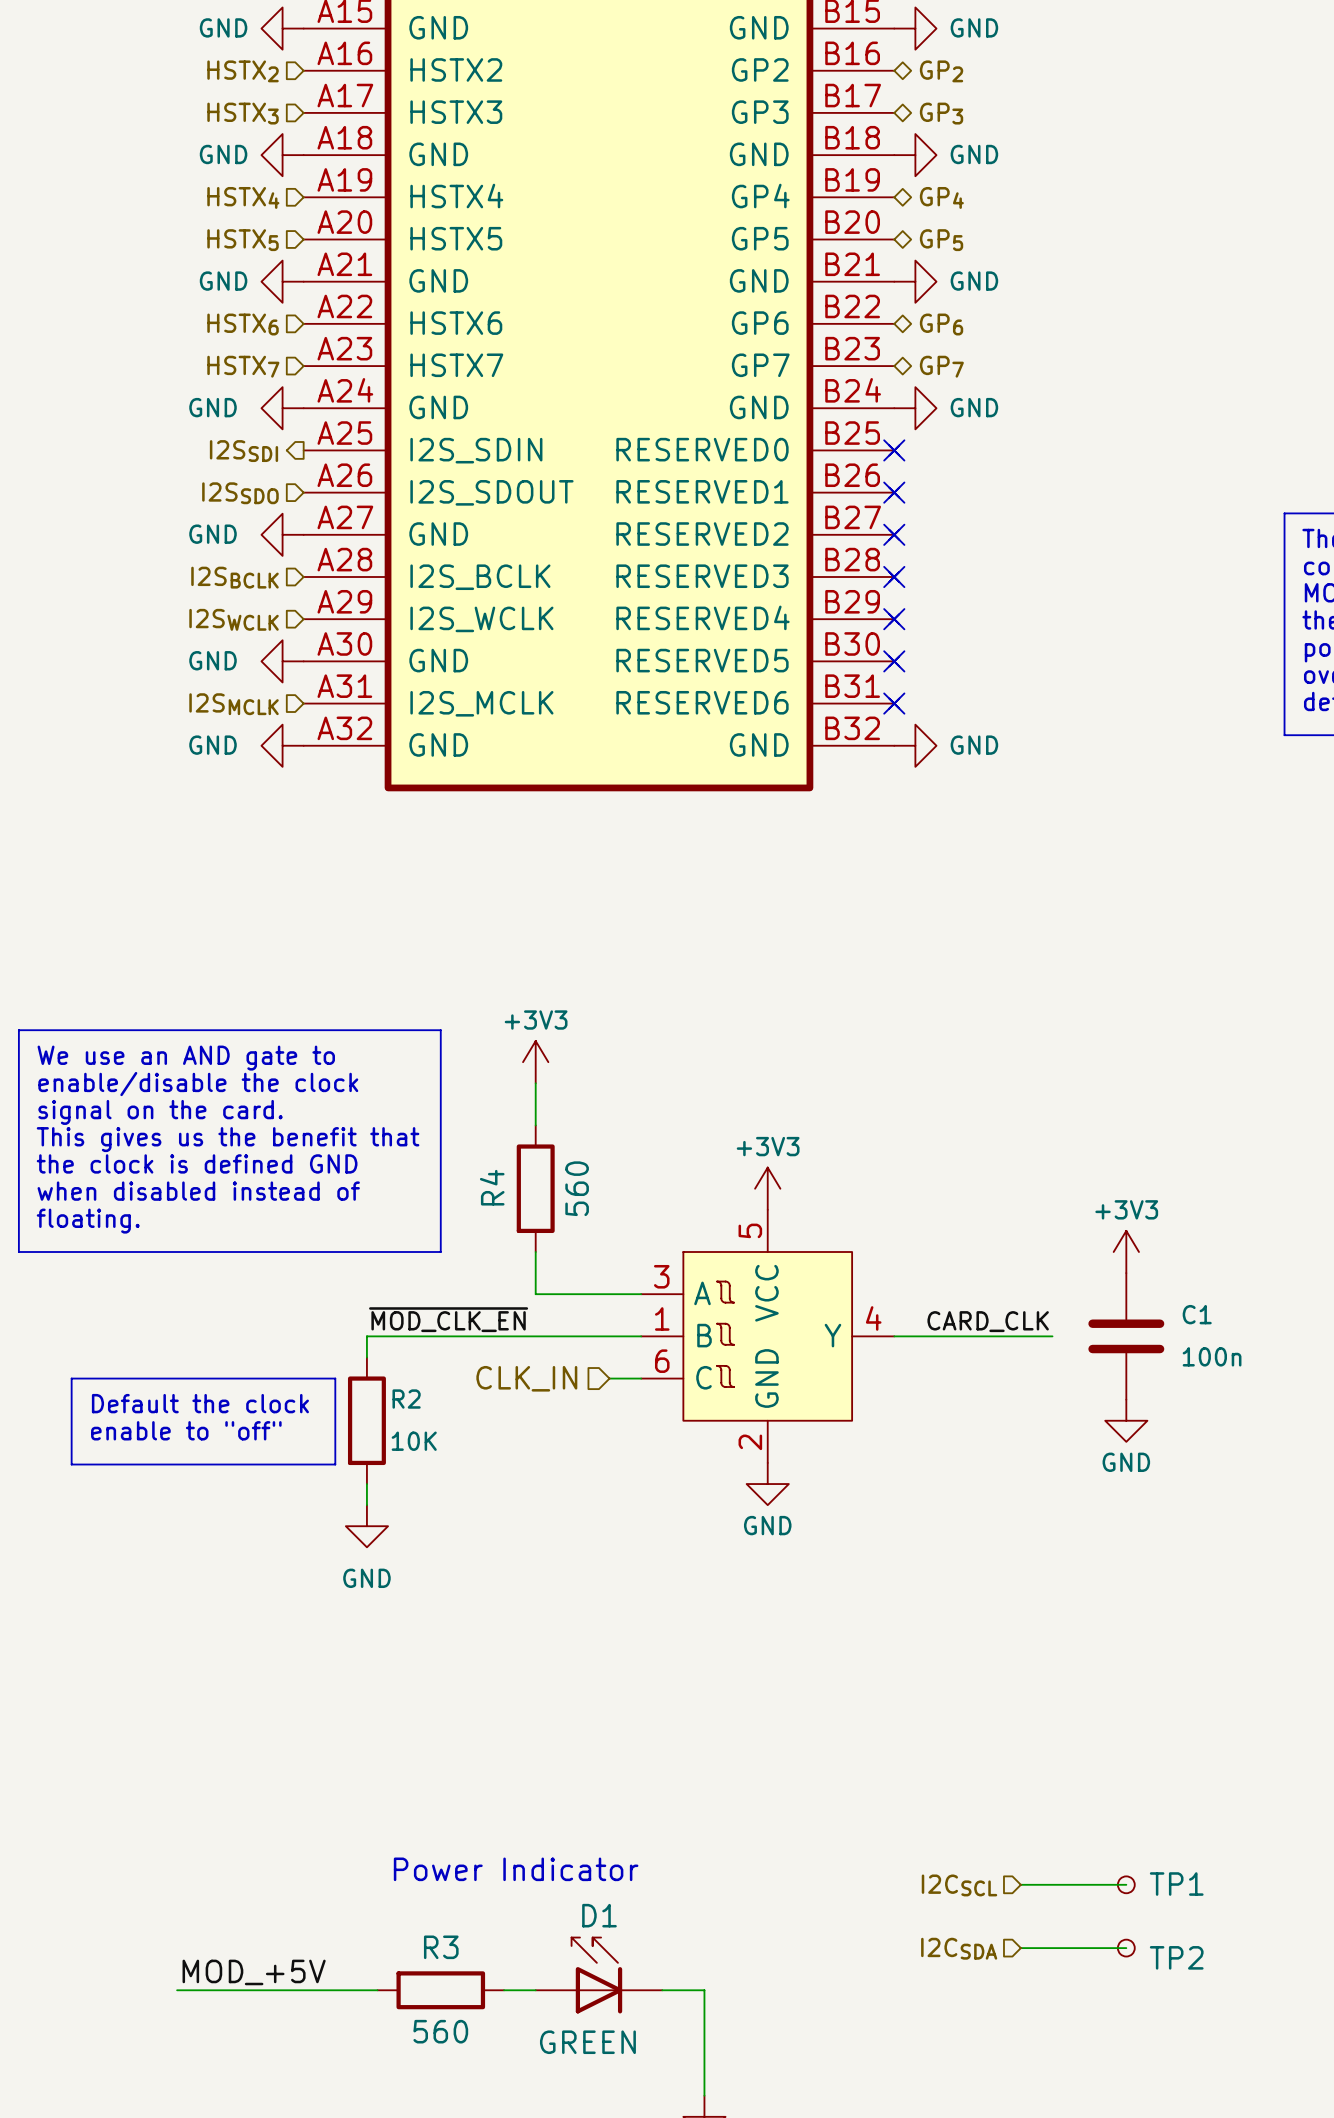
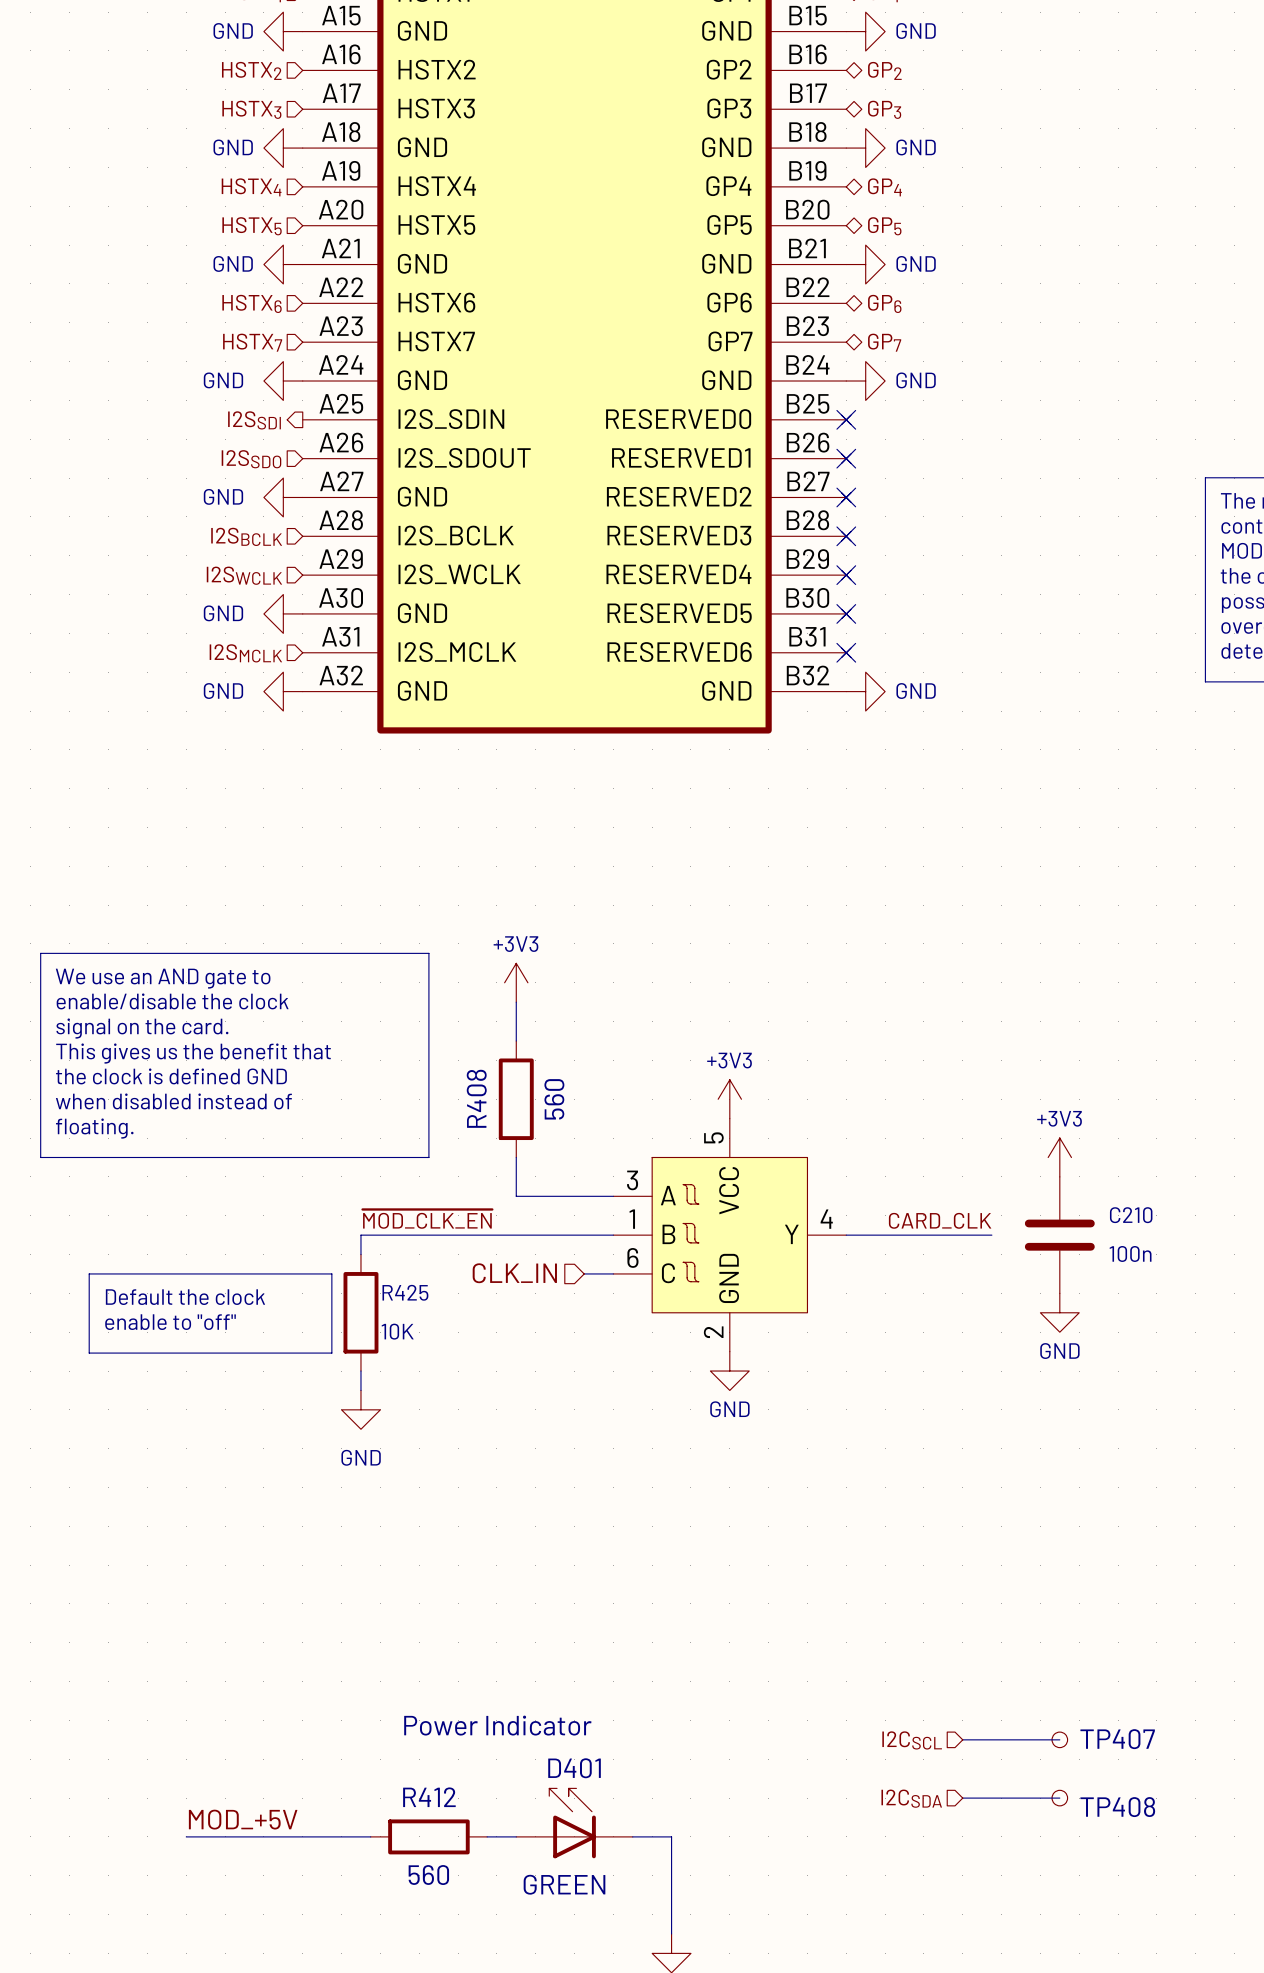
R4 name: R4 (492, 1187) -> R408 (476, 1098)
C1 name: C1 (1197, 1314) -> C210 (1131, 1215)
R2 name: R2 (406, 1399) -> R425 (405, 1292)
TP1 name: TP1 (1176, 1884) -> TP407 (1117, 1739)
D1 name: D1 (599, 1915) -> D401 (574, 1768)
R3 name: R3 (441, 1947) -> R412 (429, 1797)
TP2 name: TP2 (1176, 1957) -> TP408 (1117, 1807)

